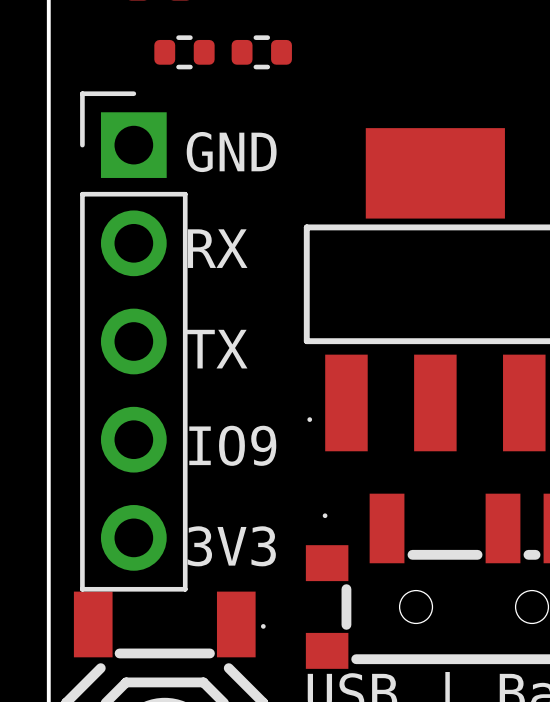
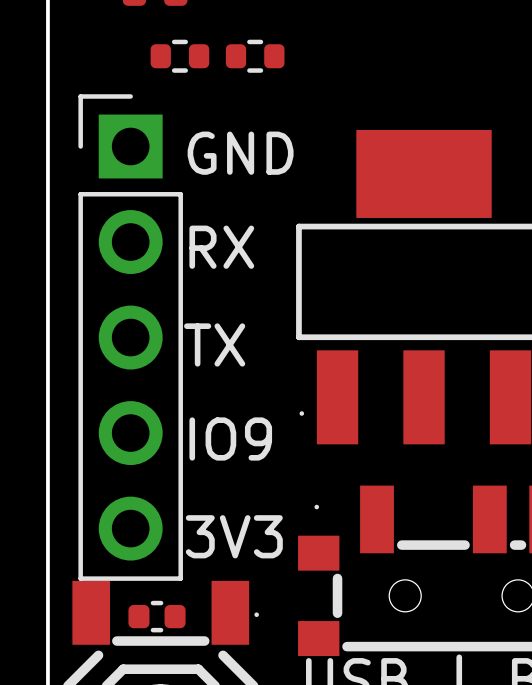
part: none -> (157, 616)

